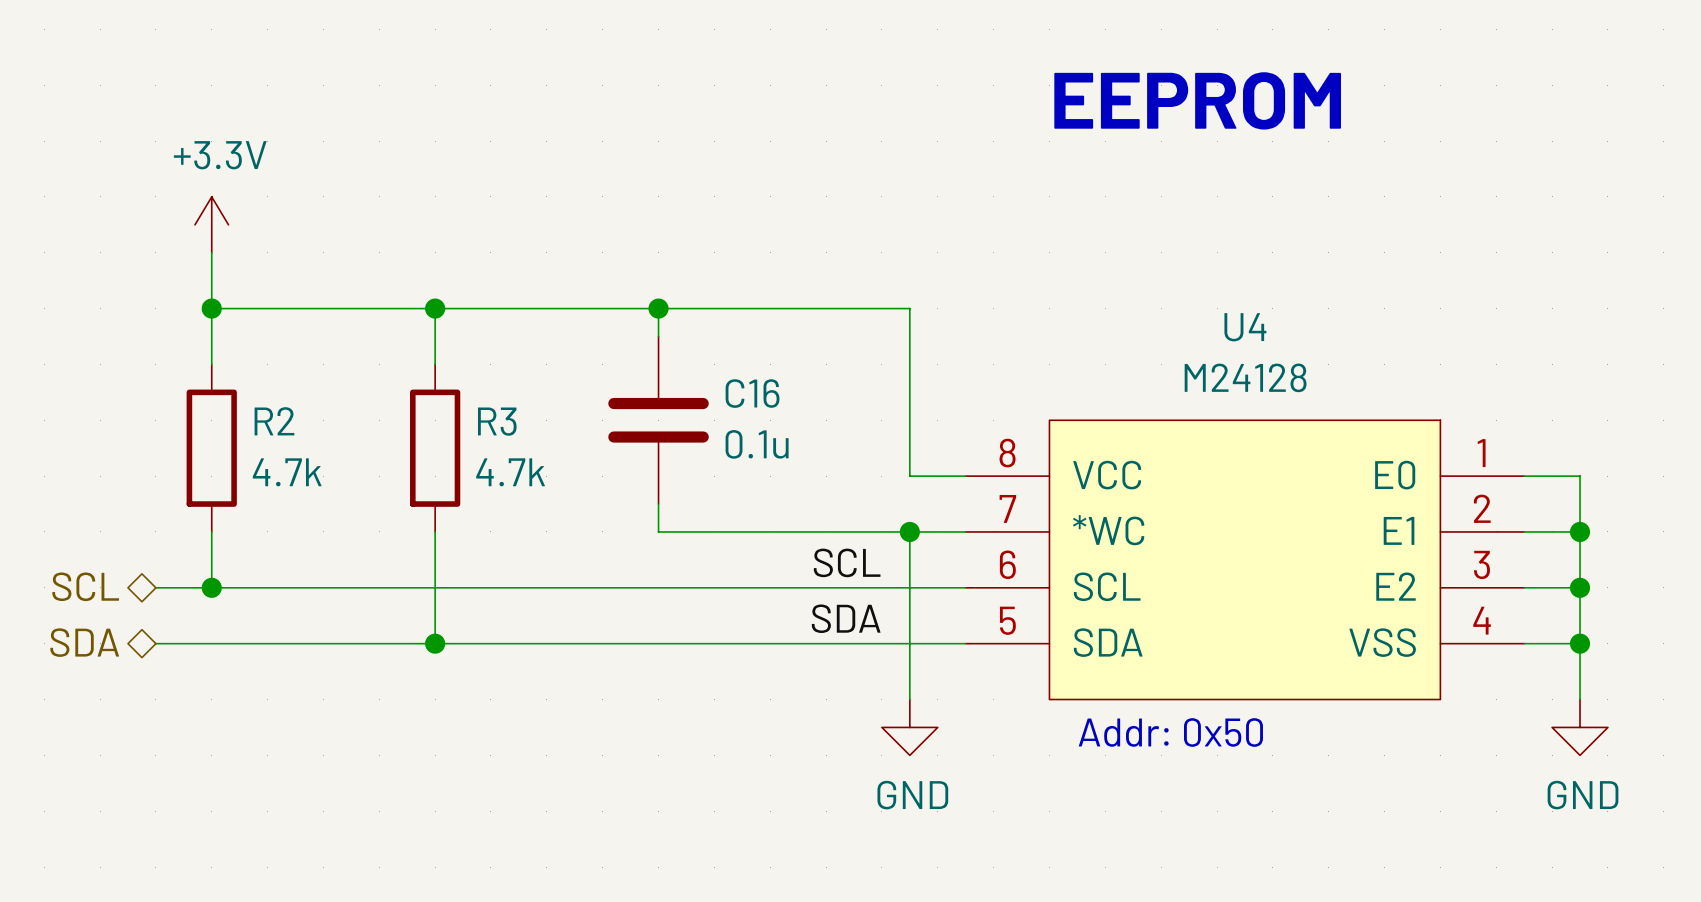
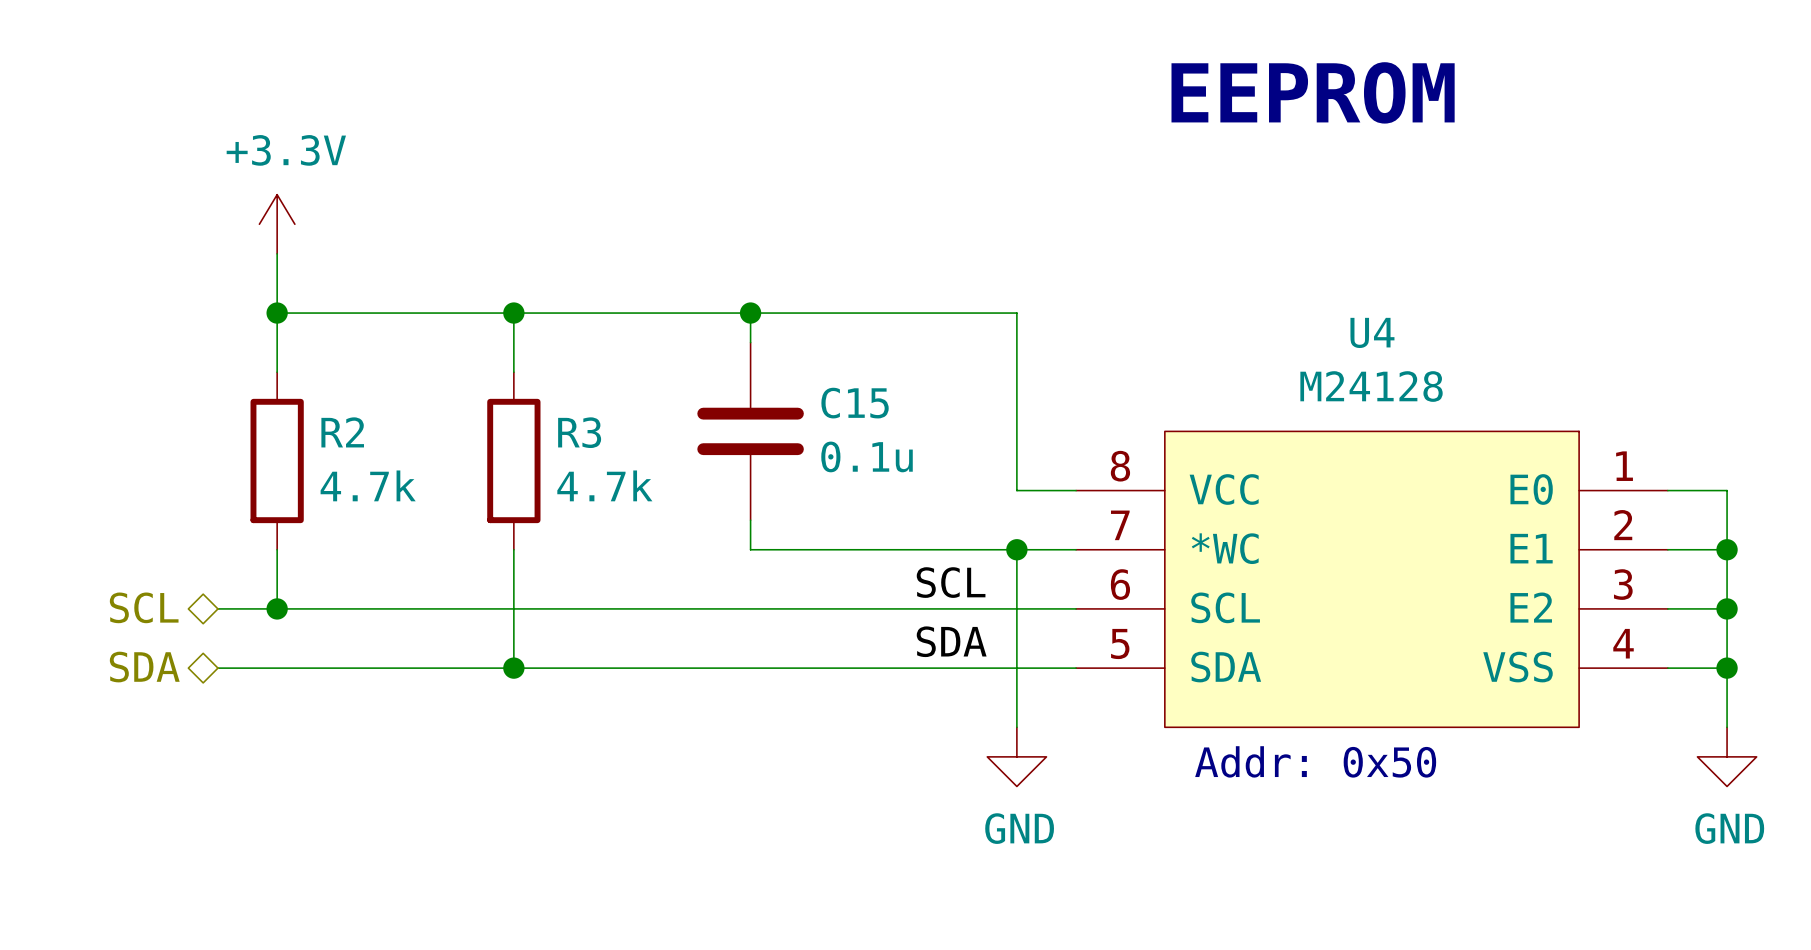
C16 name: C16 (752, 393) -> C15 (855, 403)

